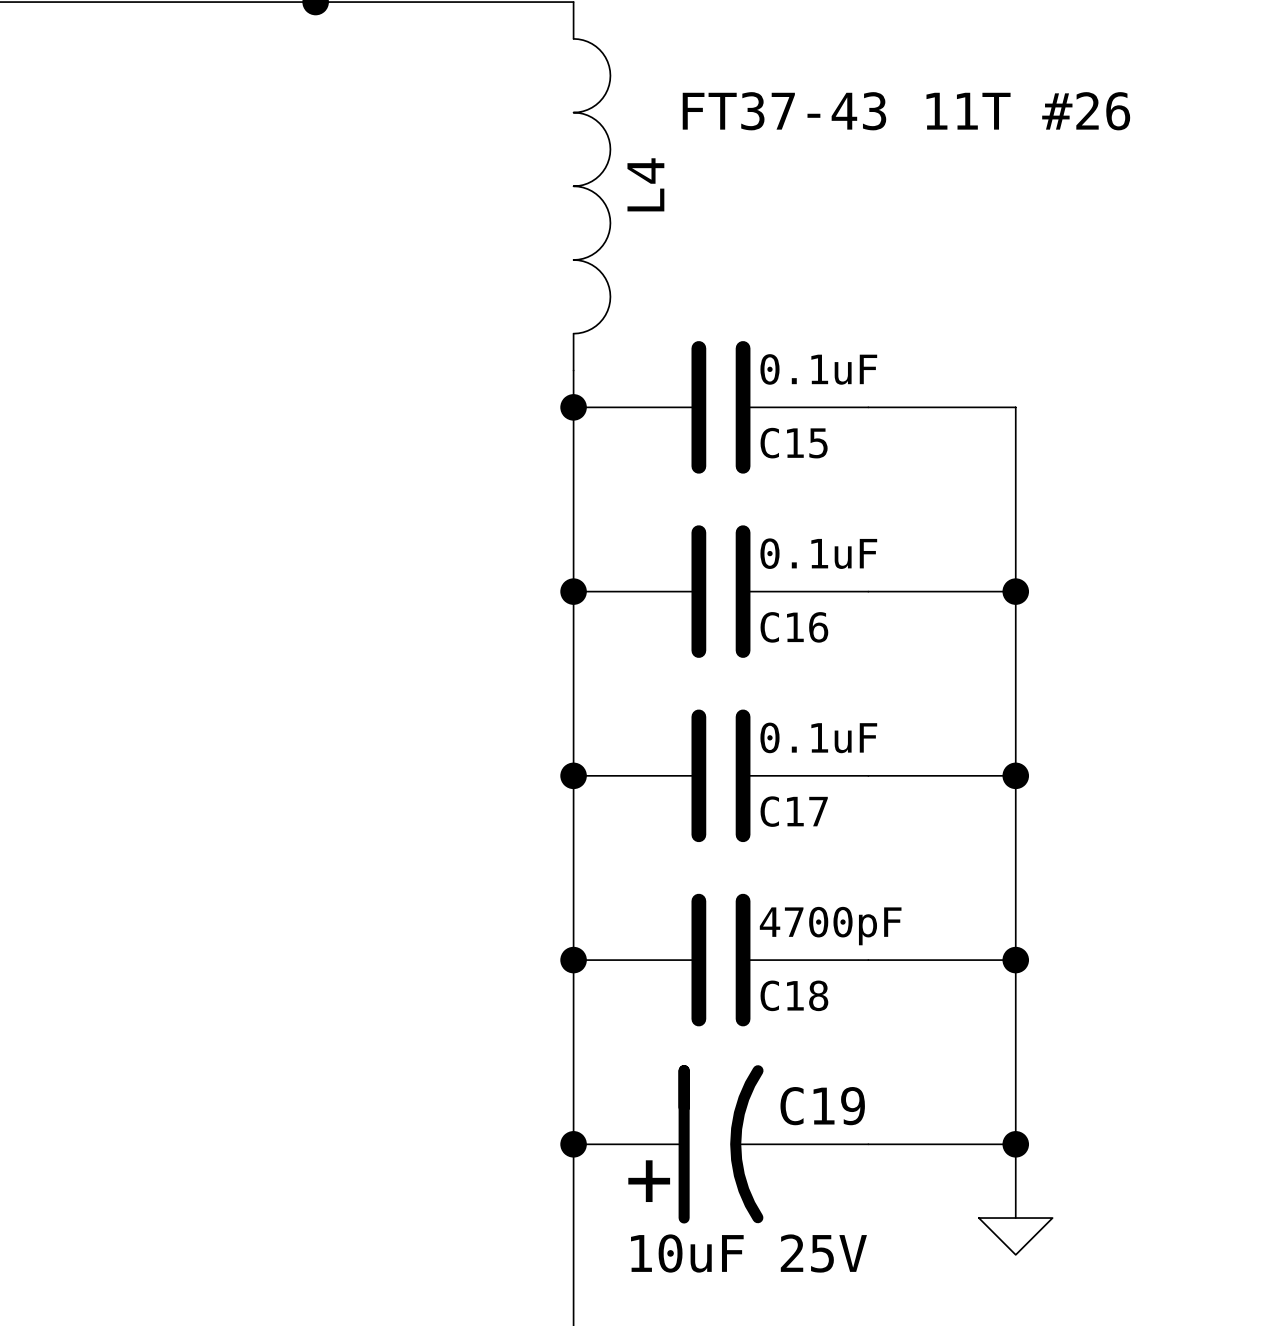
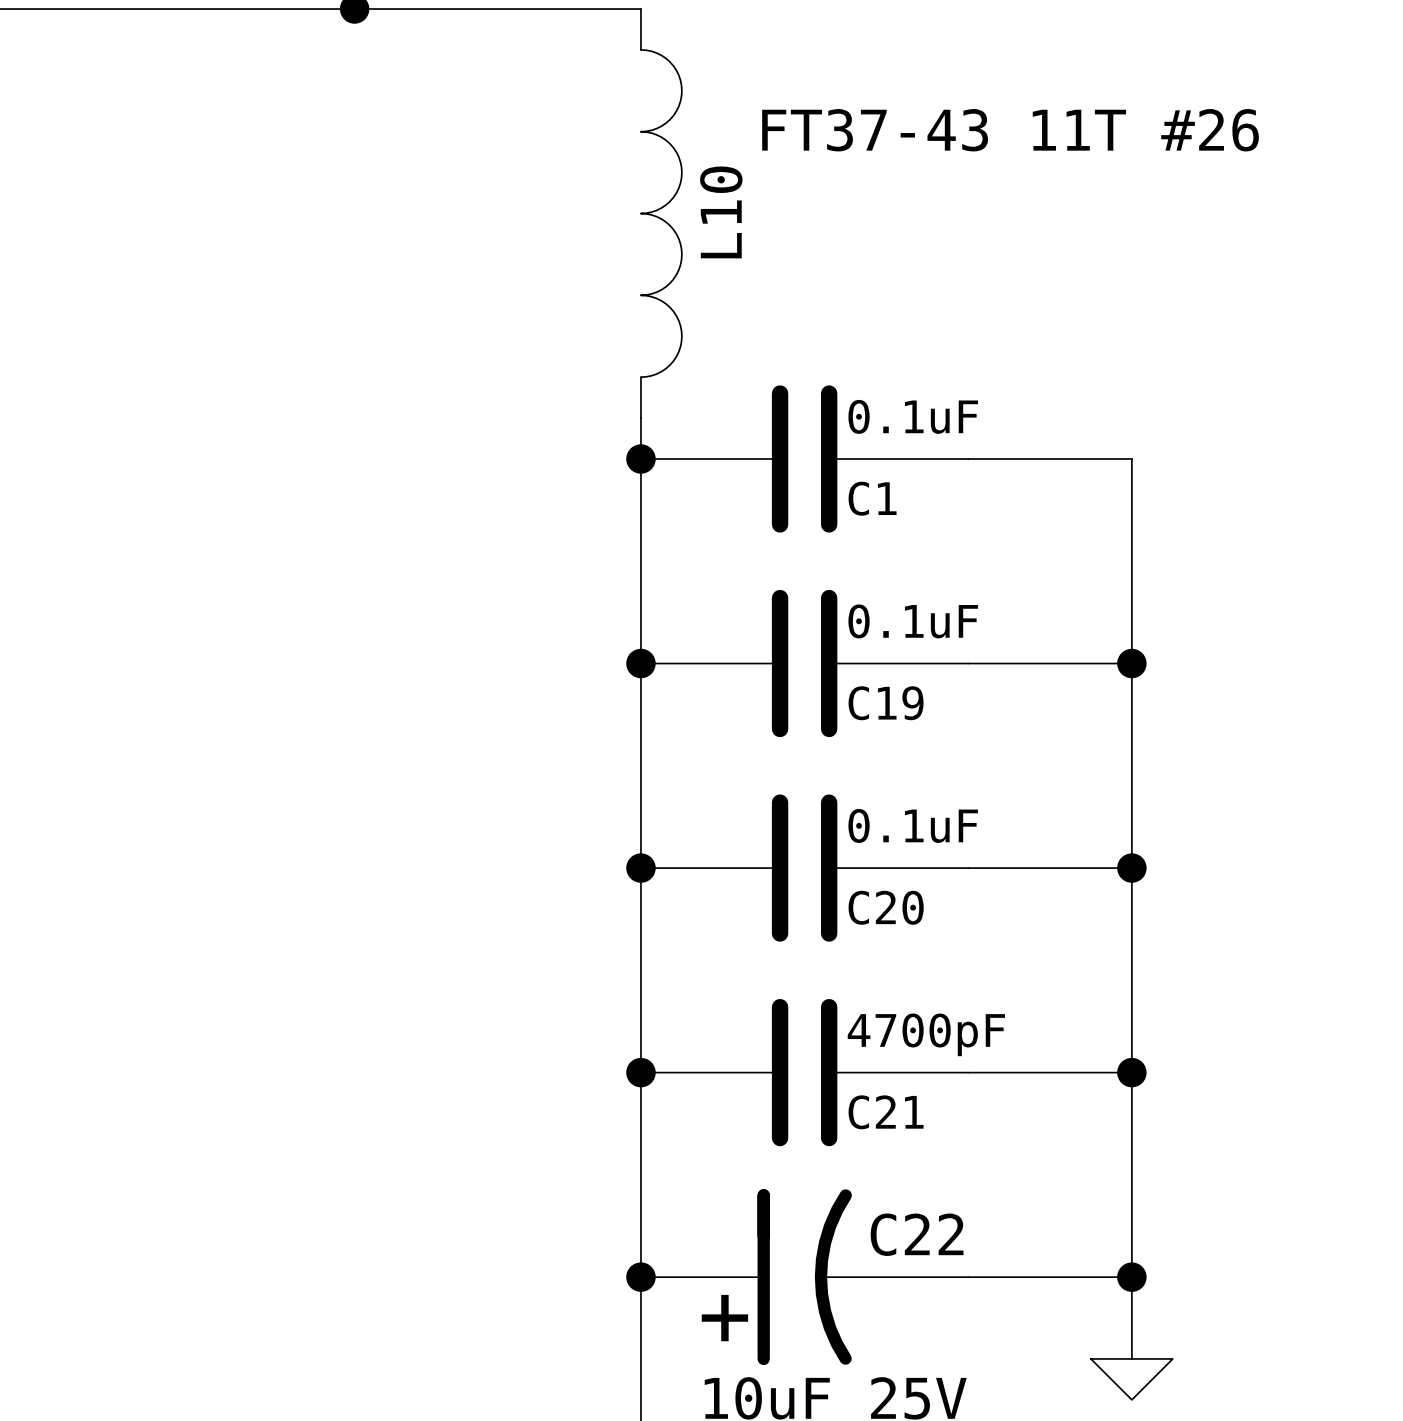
L4 name: L4 (645, 184) -> L10 (721, 212)
C15 name: C15 (794, 443) -> C1 (872, 498)
C16 name: C16 (794, 627) -> C19 (886, 703)
C17 name: C17 (794, 811) -> C20 (886, 907)
C18 name: C18 (794, 995) -> C21 (886, 1112)
C19 name: C19 (822, 1106) -> C22 (917, 1234)

